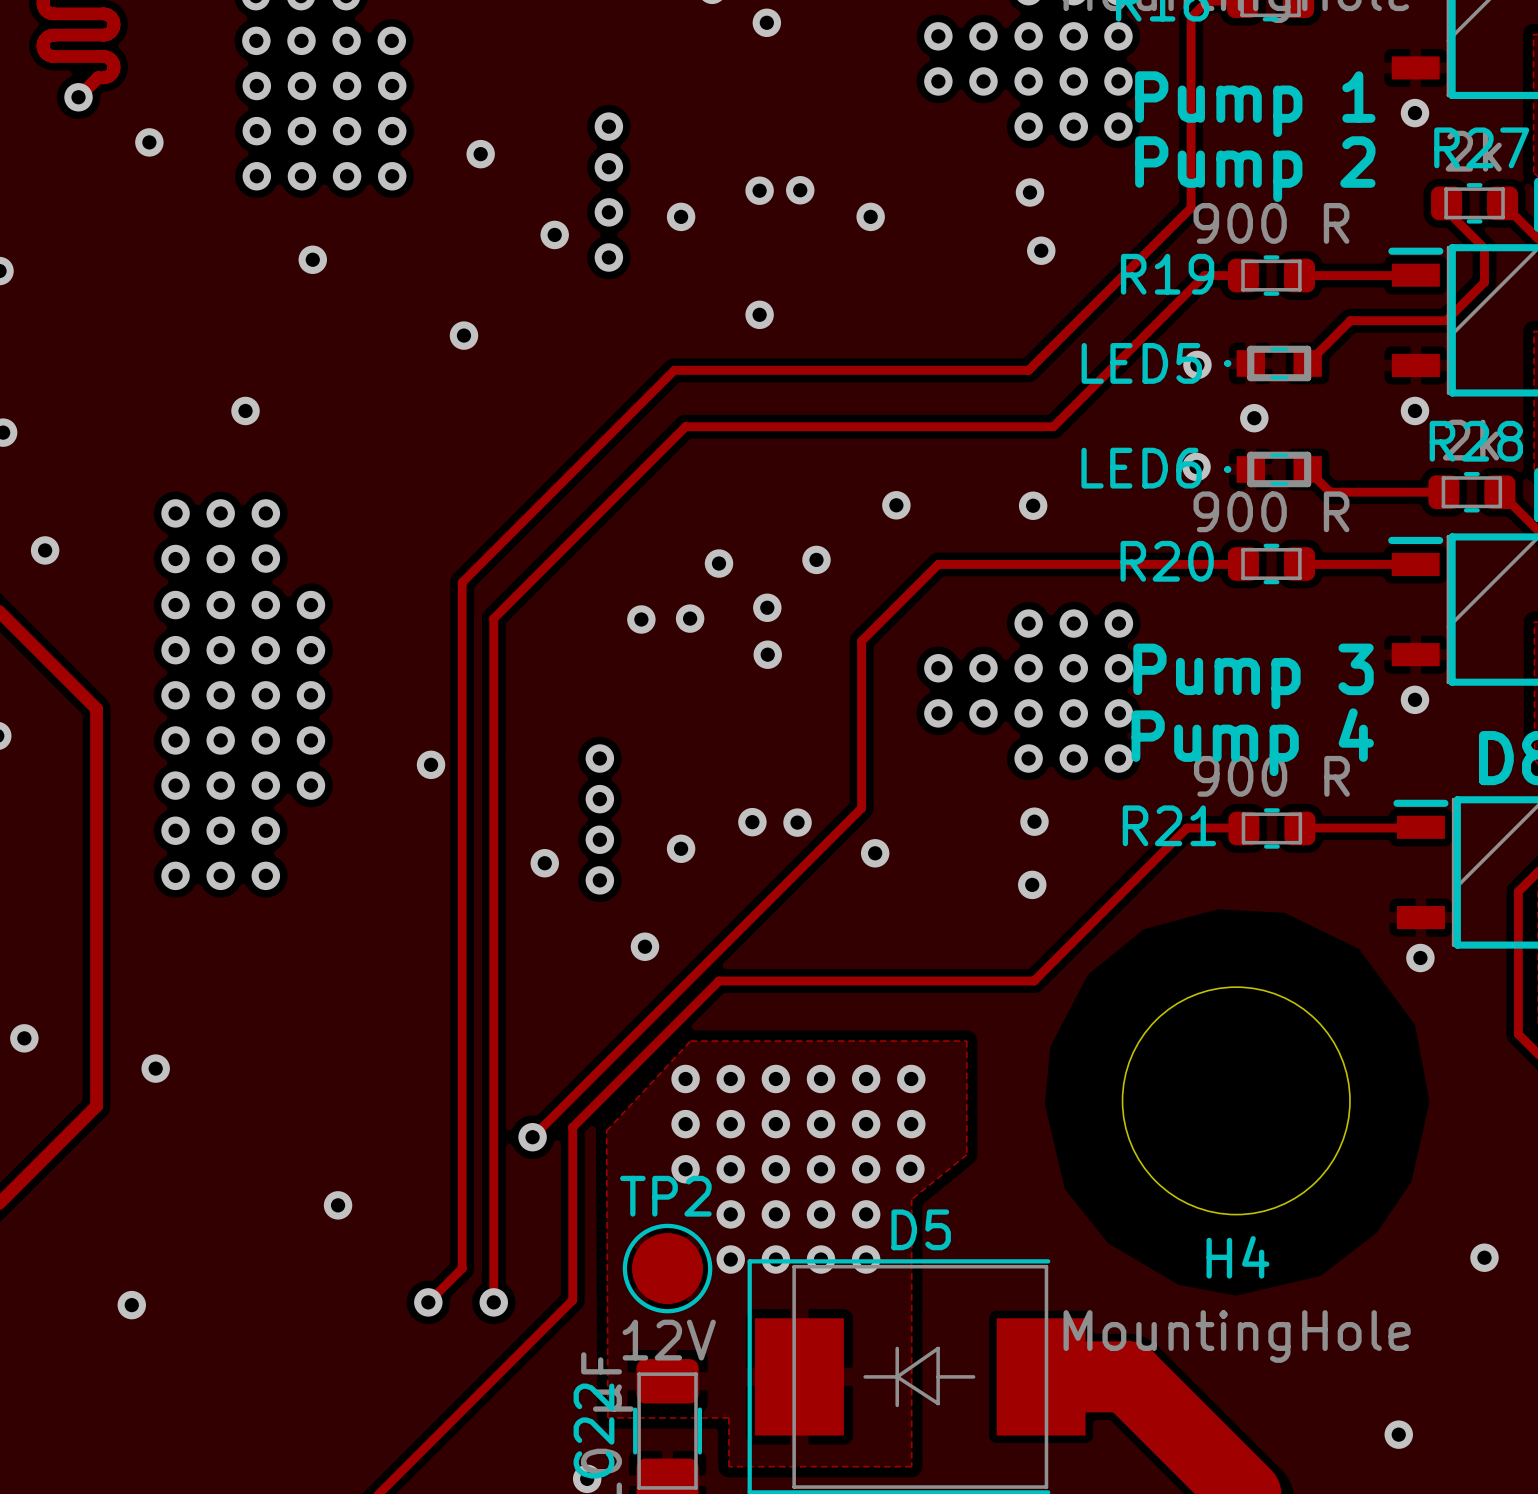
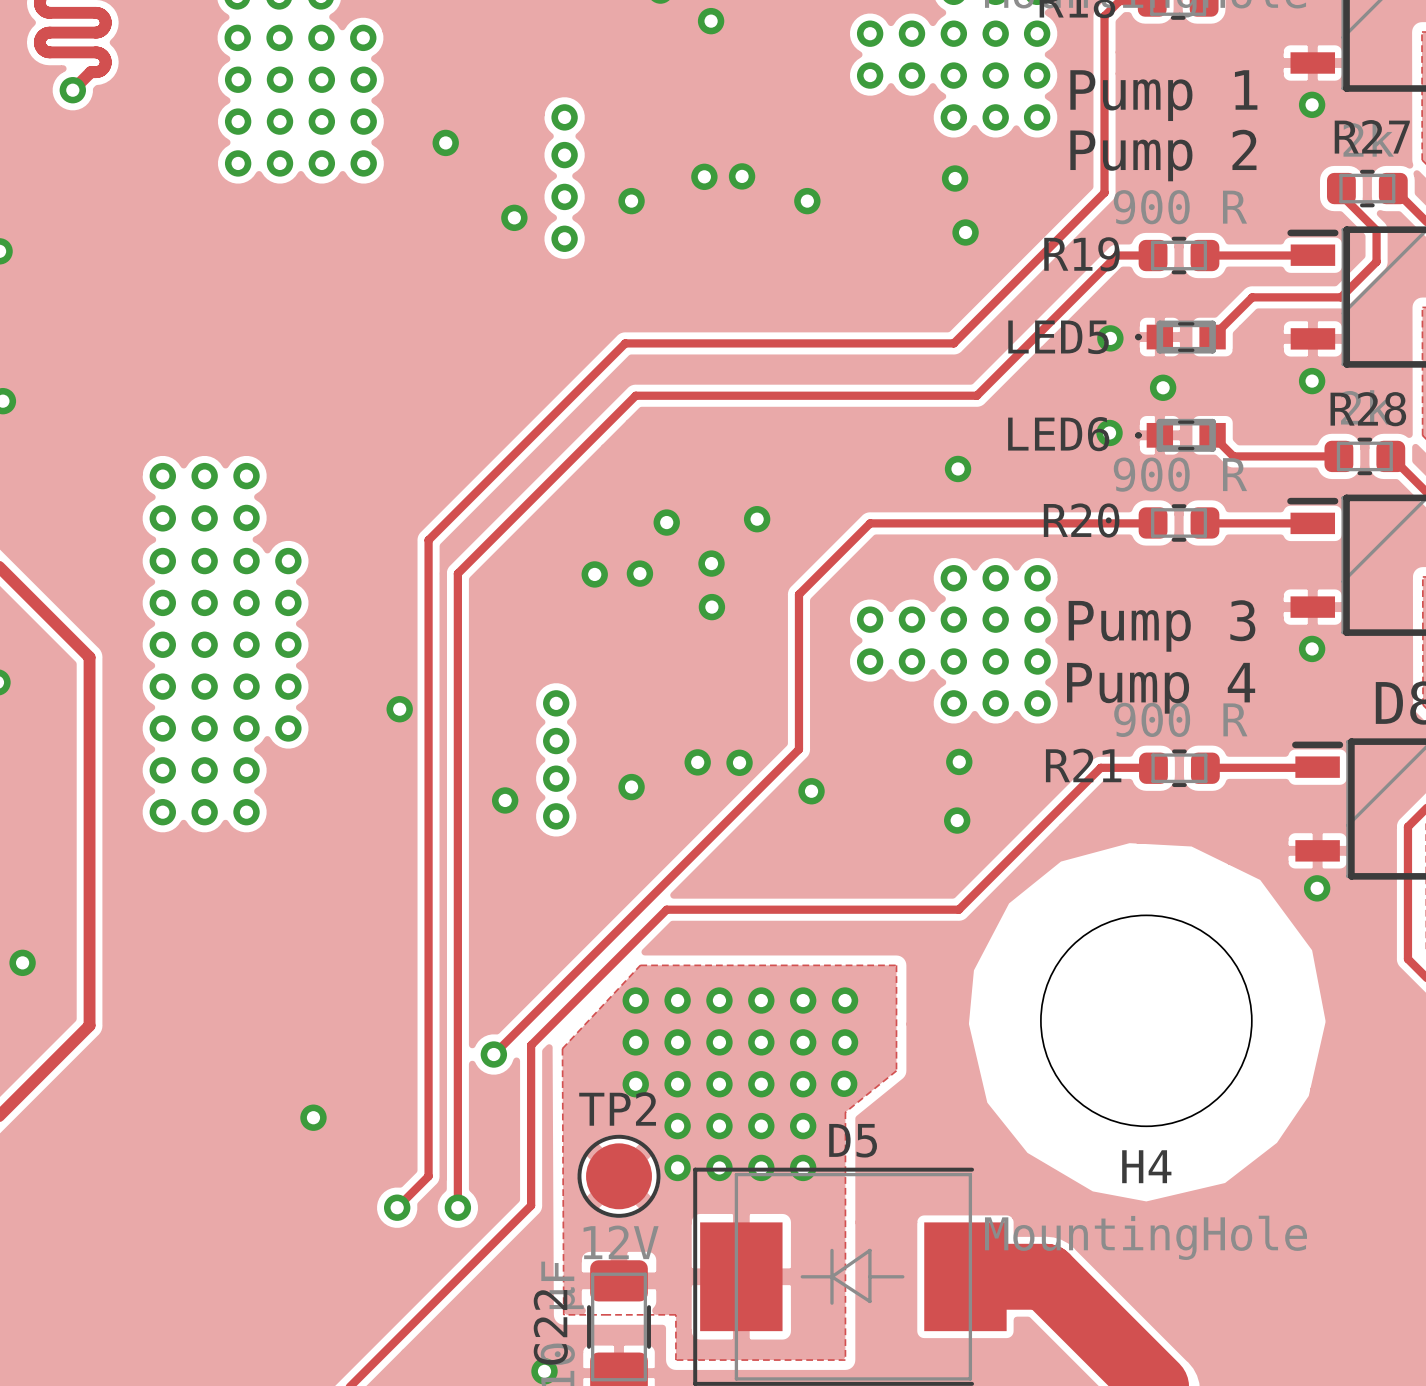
via: (149, 142) -> none
via: (312, 259) -> none
via: (759, 314) -> none
via: (463, 335) -> none
via: (245, 410) -> none
via: (896, 505) -> none
via: (45, 550) -> none
via: (644, 946) -> none
via: (155, 1068) -> none
via: (1484, 1257) -> none
via: (131, 1305) -> none
via: (1398, 1434) -> none

